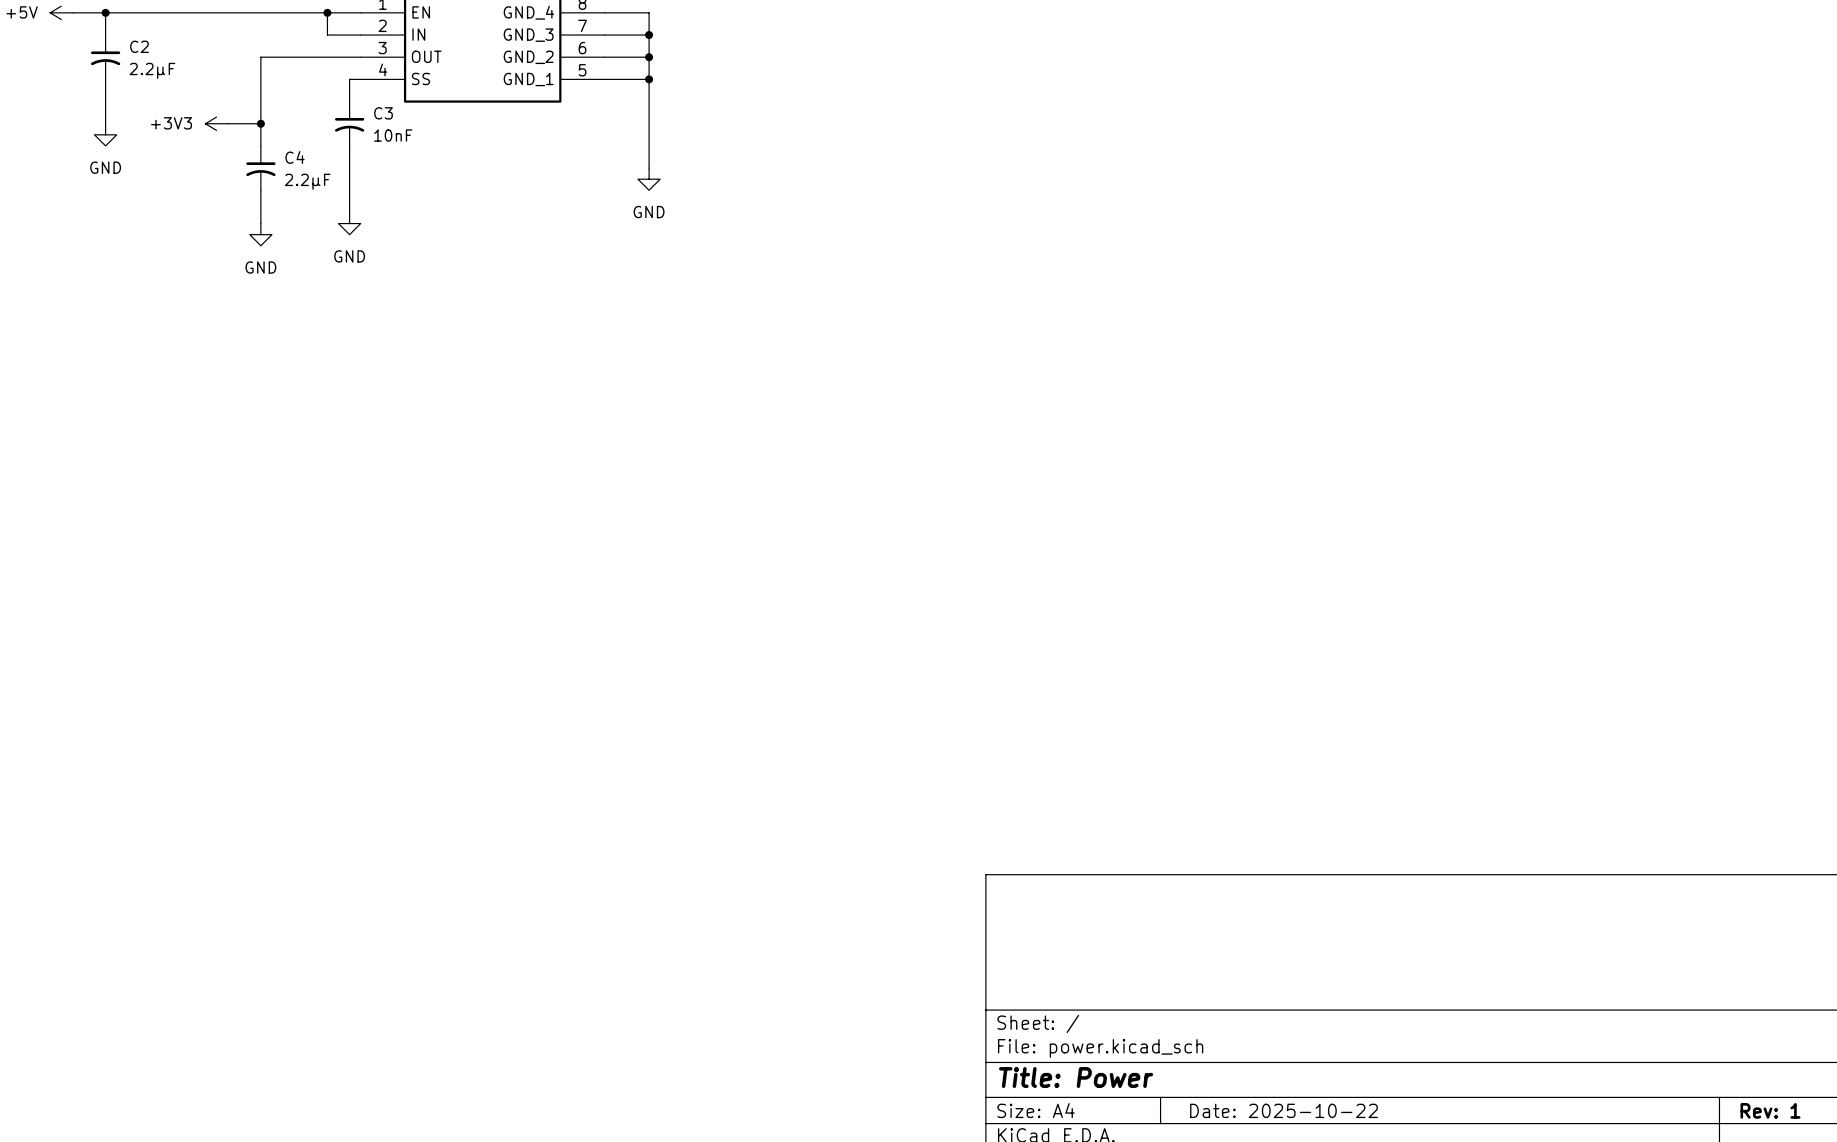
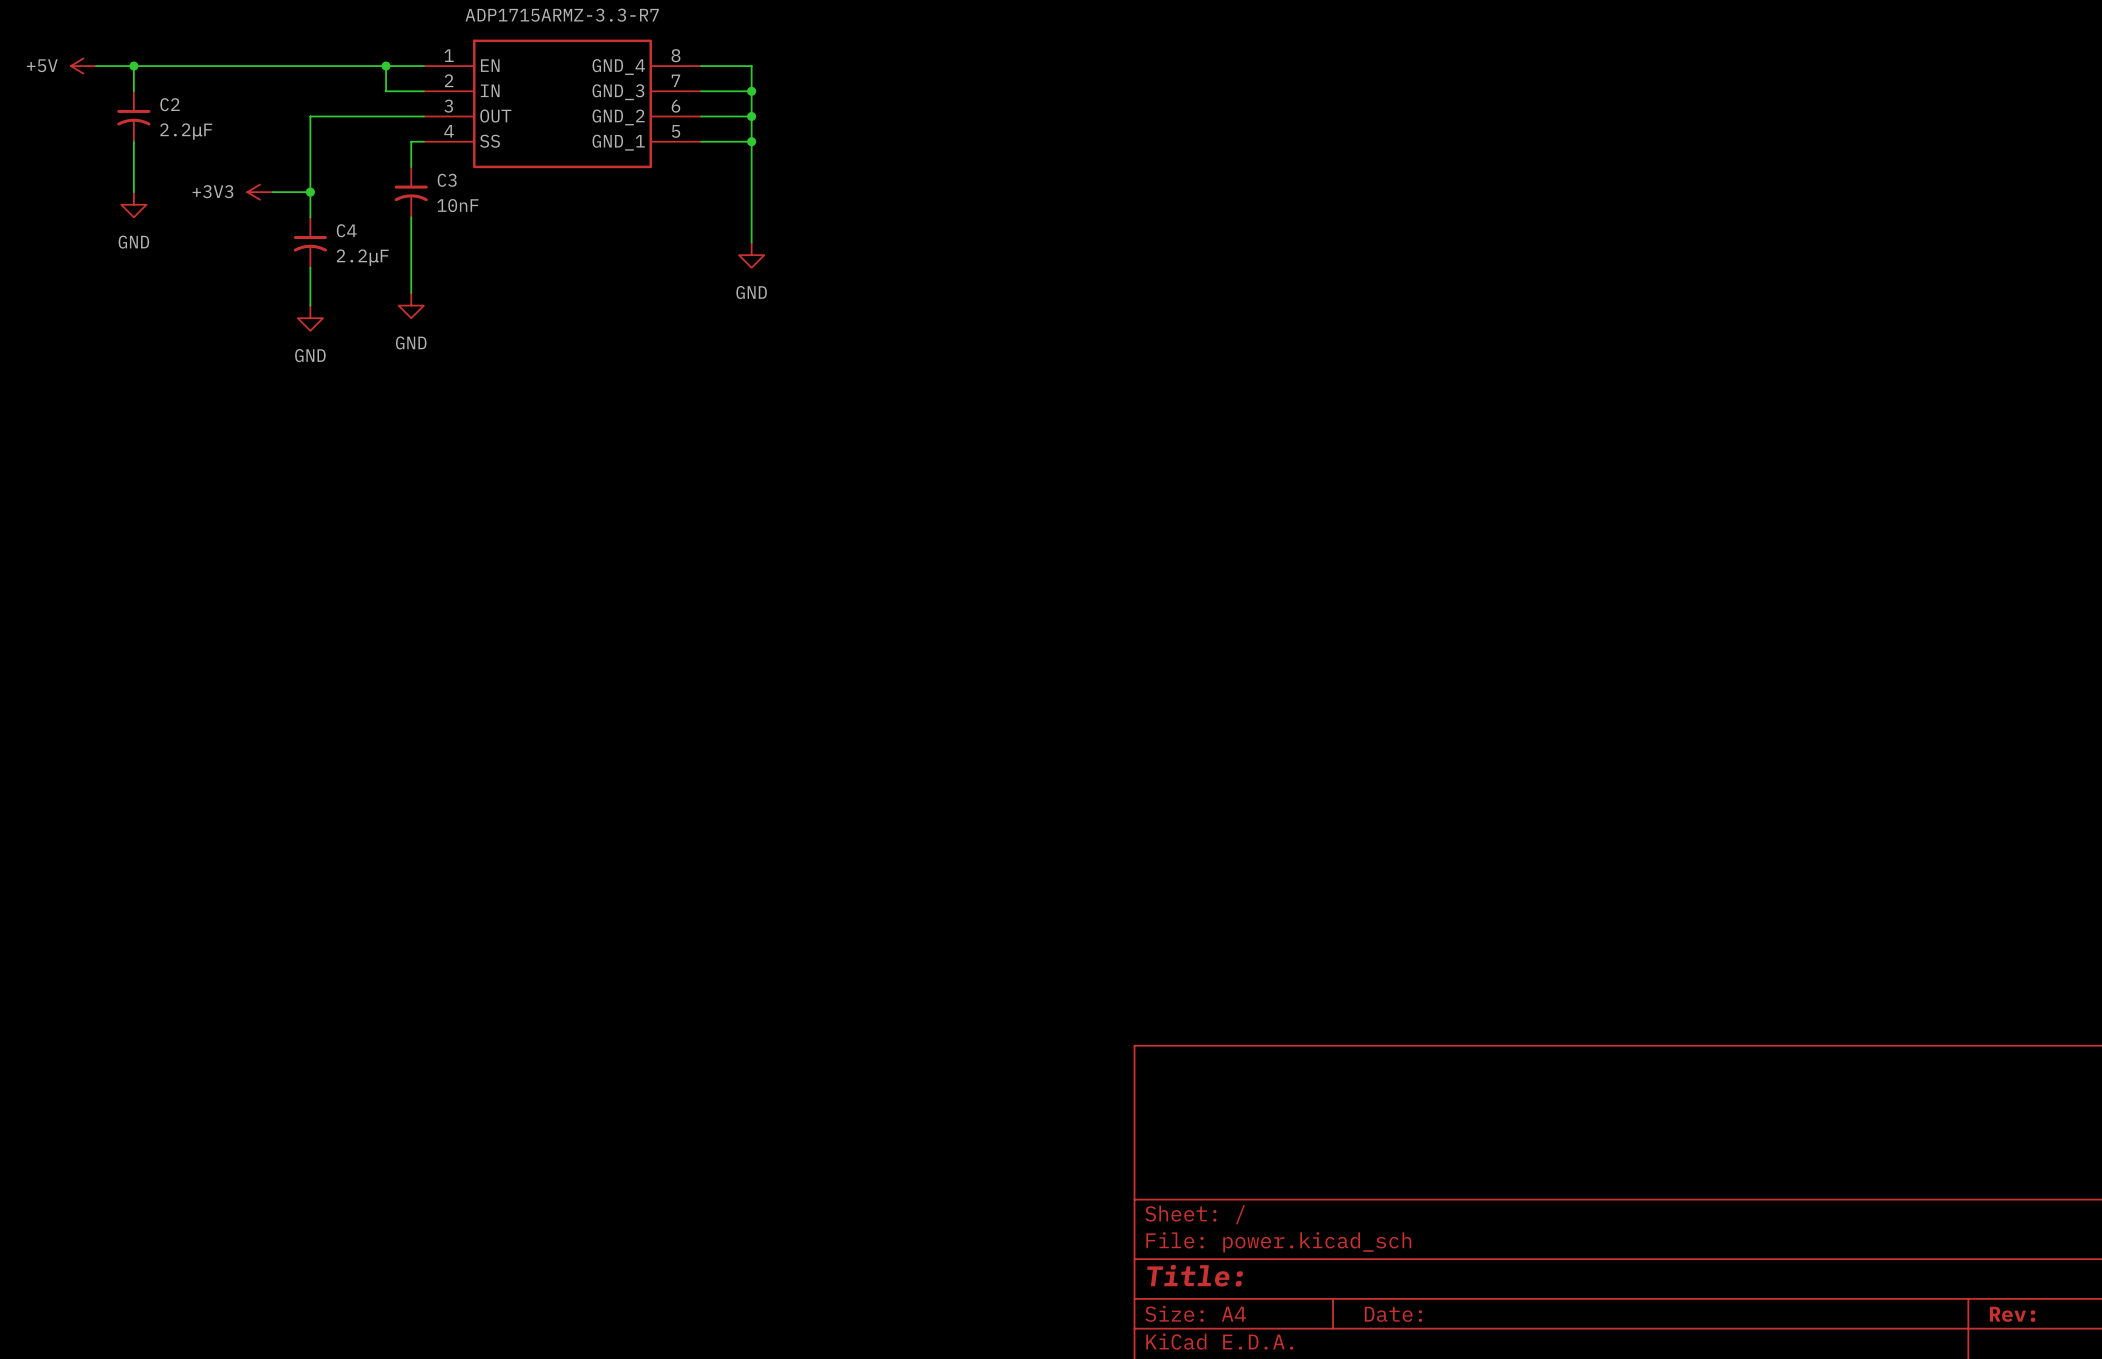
title block: Title: Power (1076, 1077) -> Title: (1195, 1275)
title block: Date: 2025-10-22 (1284, 1110) -> Date: (1393, 1314)
title block: Rev: 1 (1770, 1110) -> Rev: (2012, 1314)

